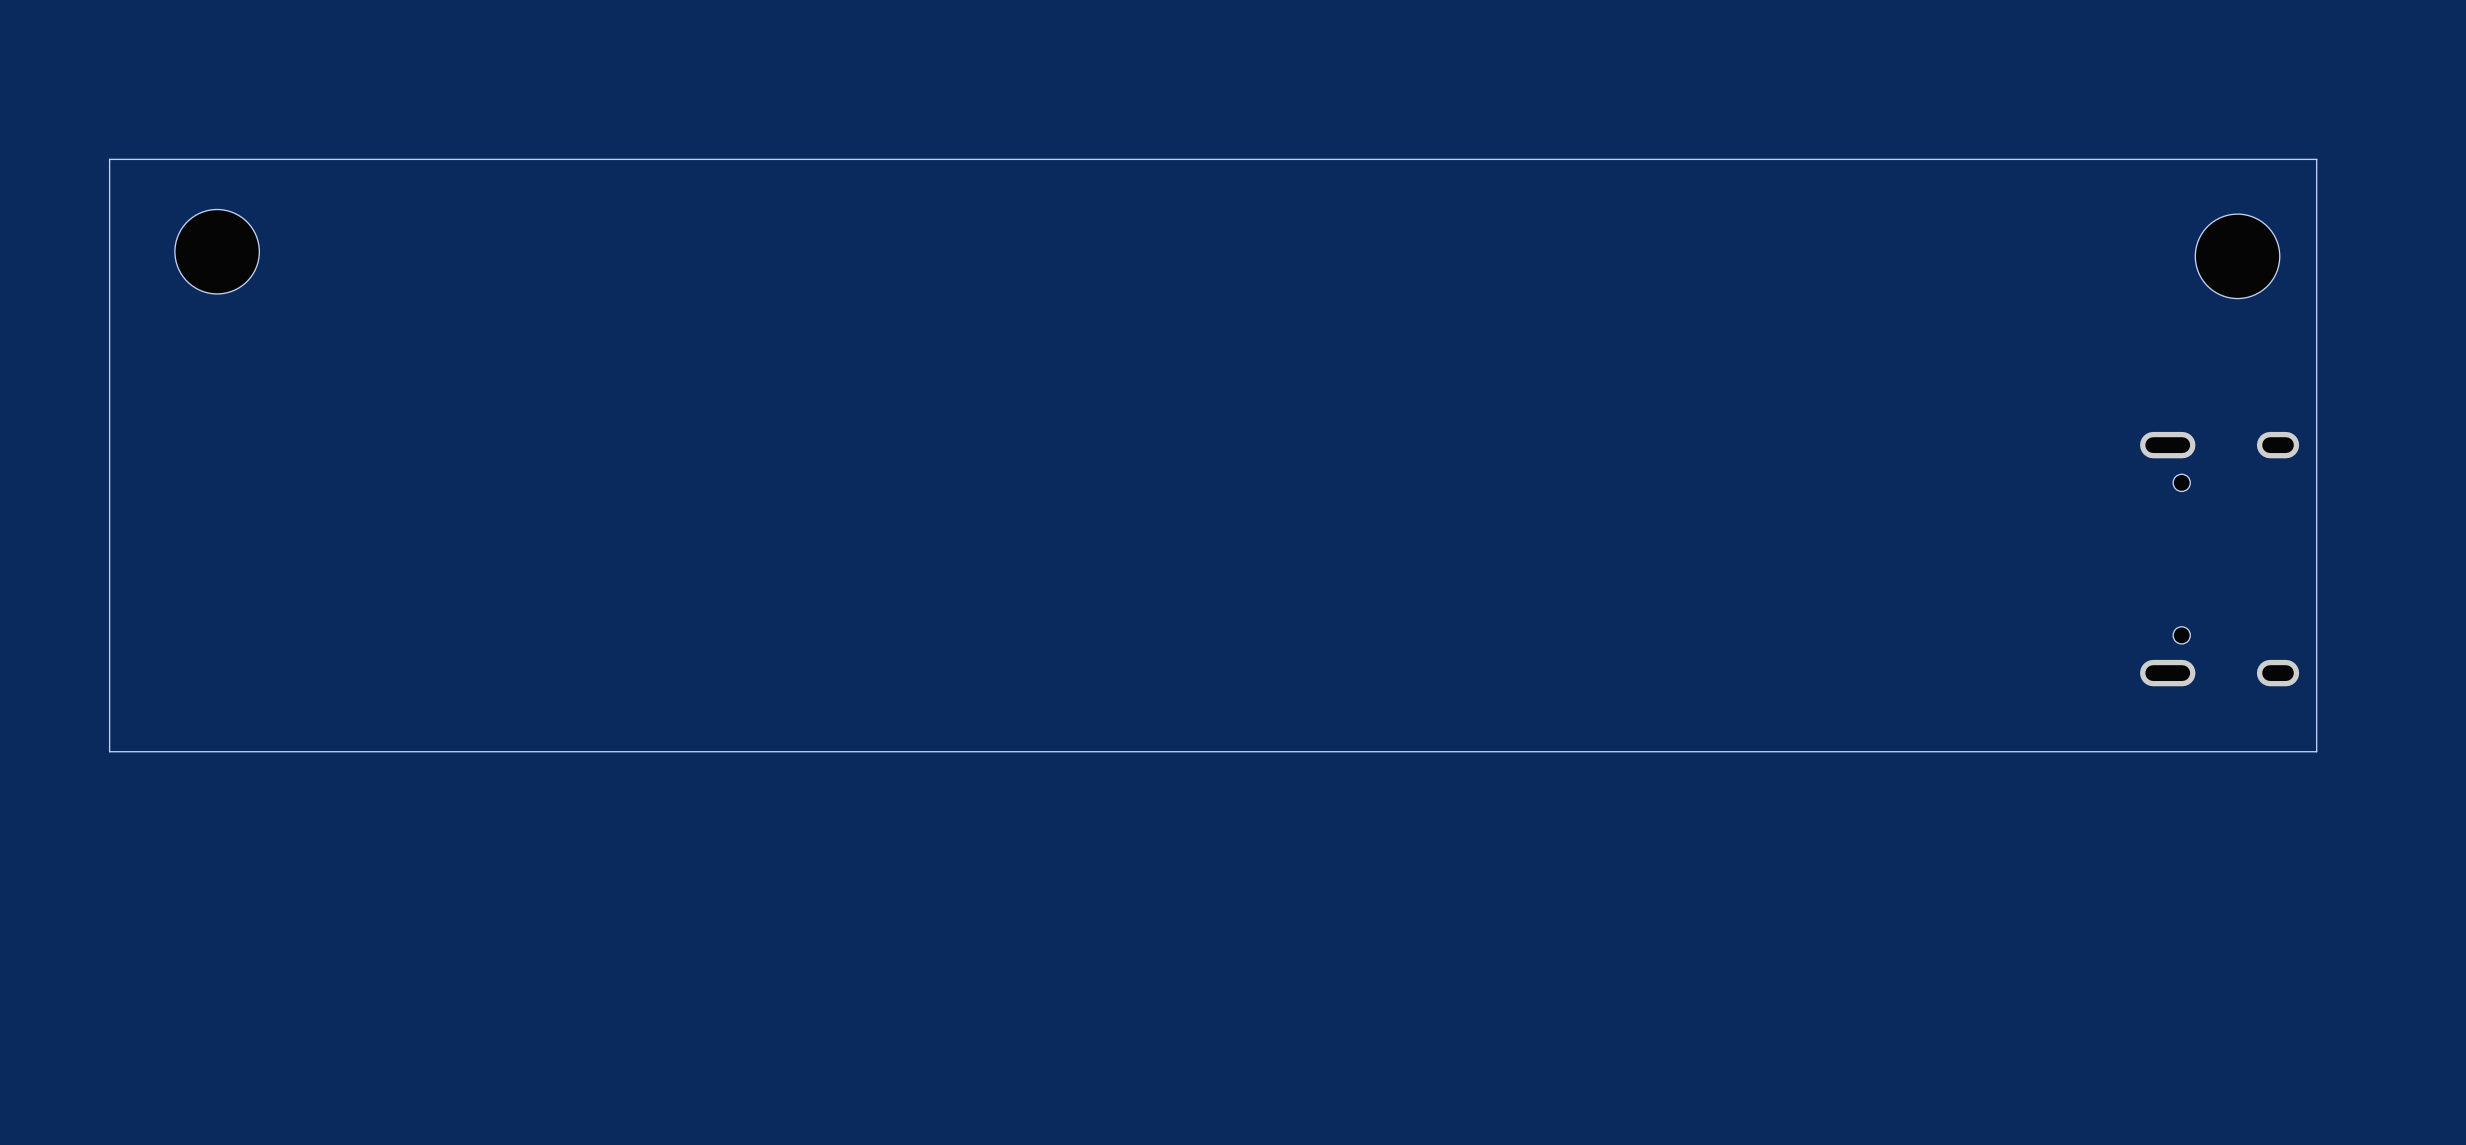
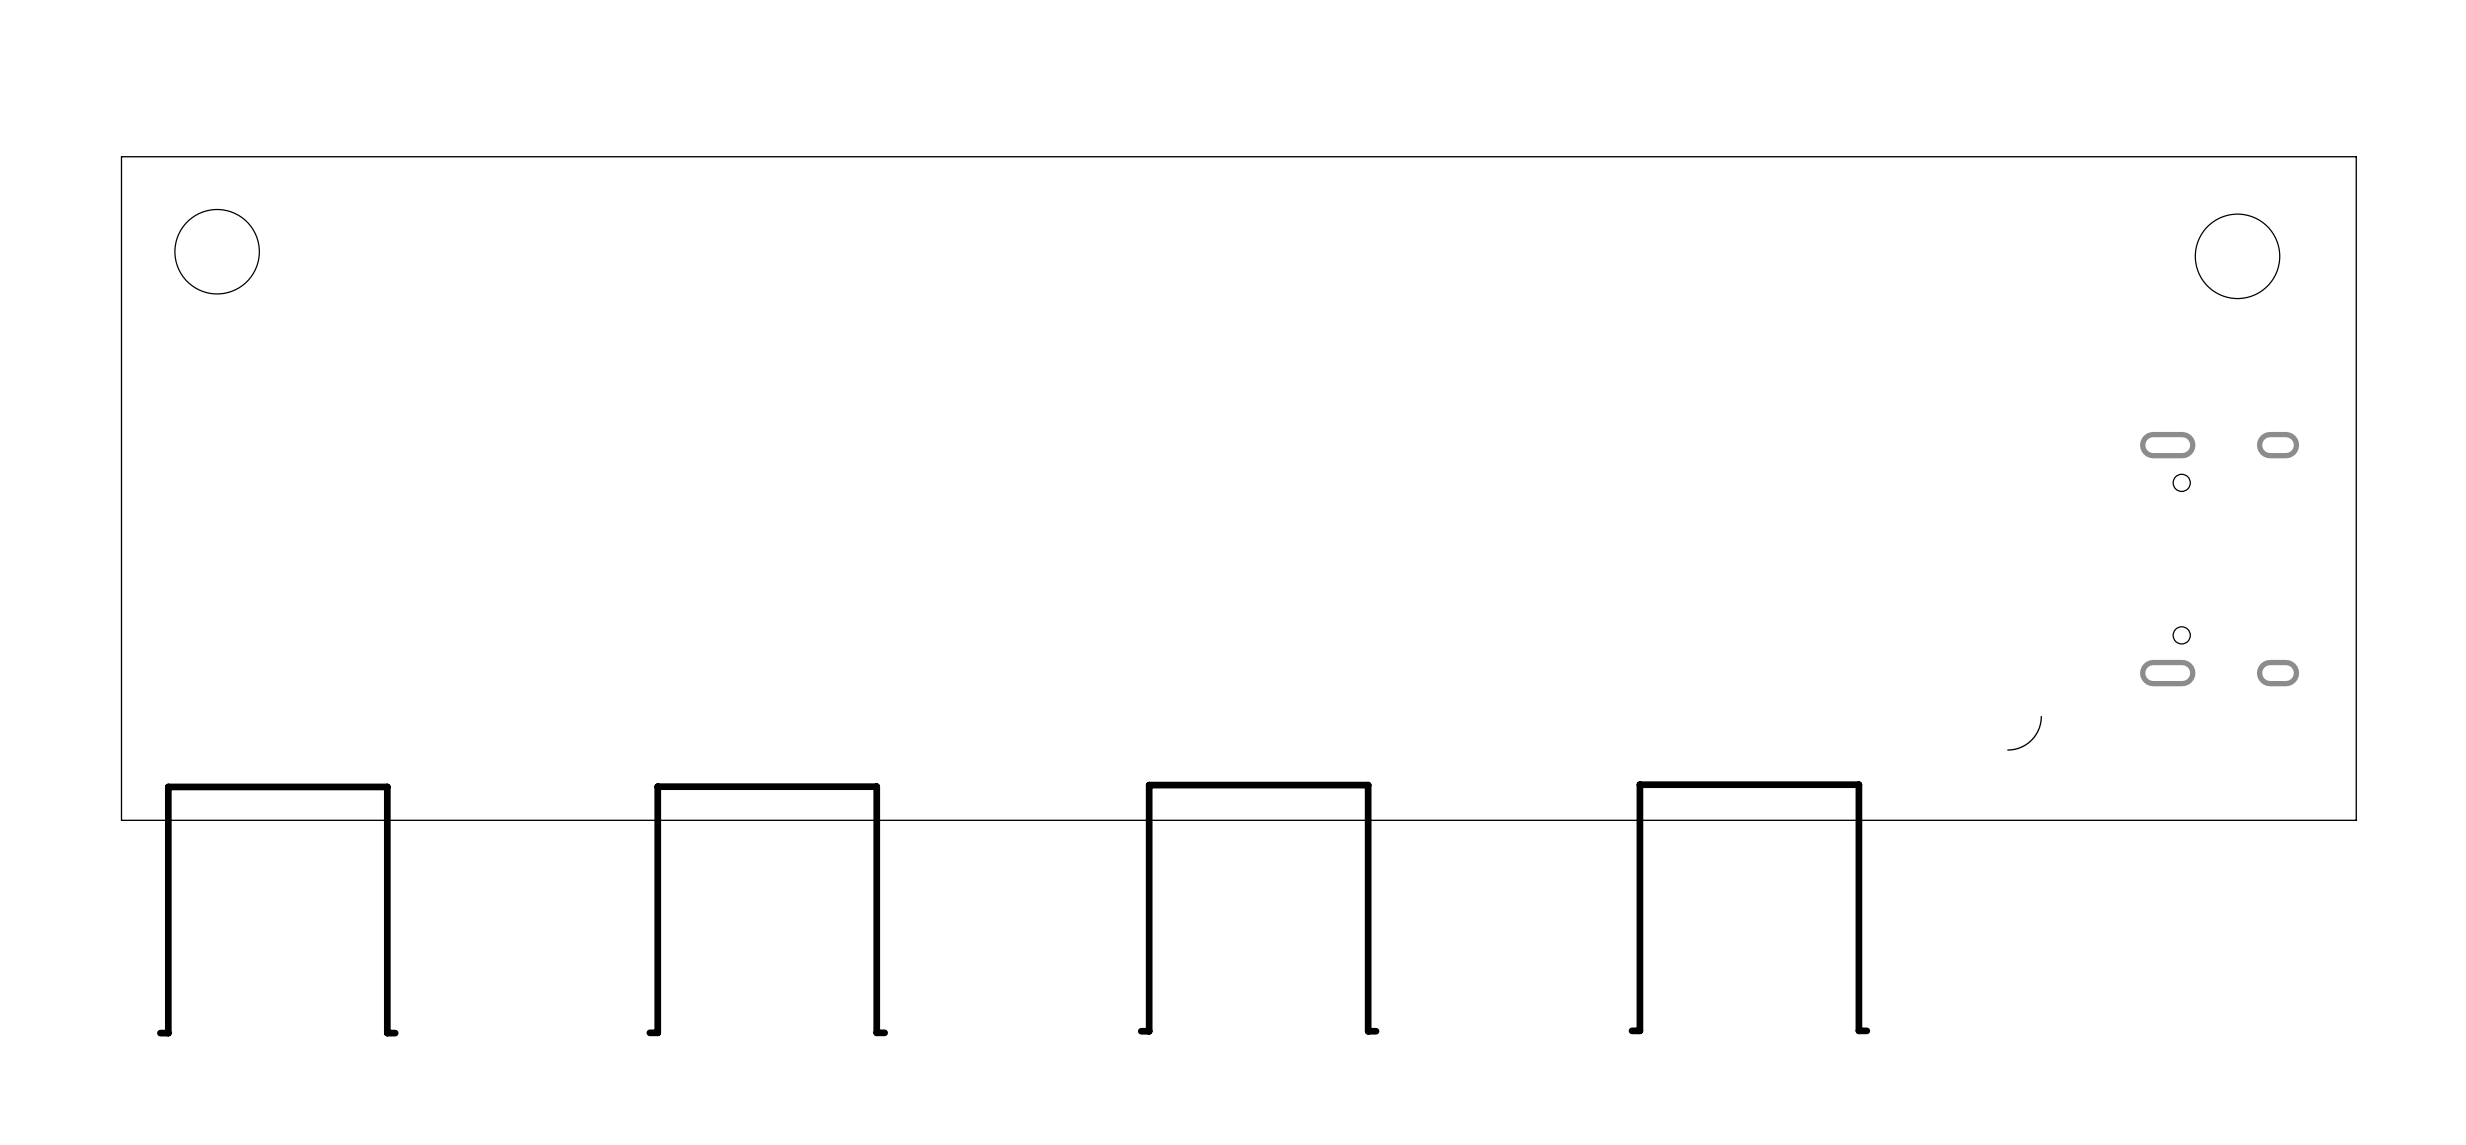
board edge: (2316, 159) (109, 159) (109, 751) (2316, 751) (2316, 159) -> (2356, 820) (121, 820) (121, 156) (2356, 156) (2356, 820)
board edge: none -> (2041, 716) (2038, 731) (2031, 740) (2018, 748) (2007, 750)
part: none -> (1749, 907)
part: none -> (1258, 908)
part: none -> (767, 909)
part: none -> (277, 910)

